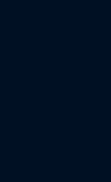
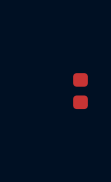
part: none -> (80, 91)

